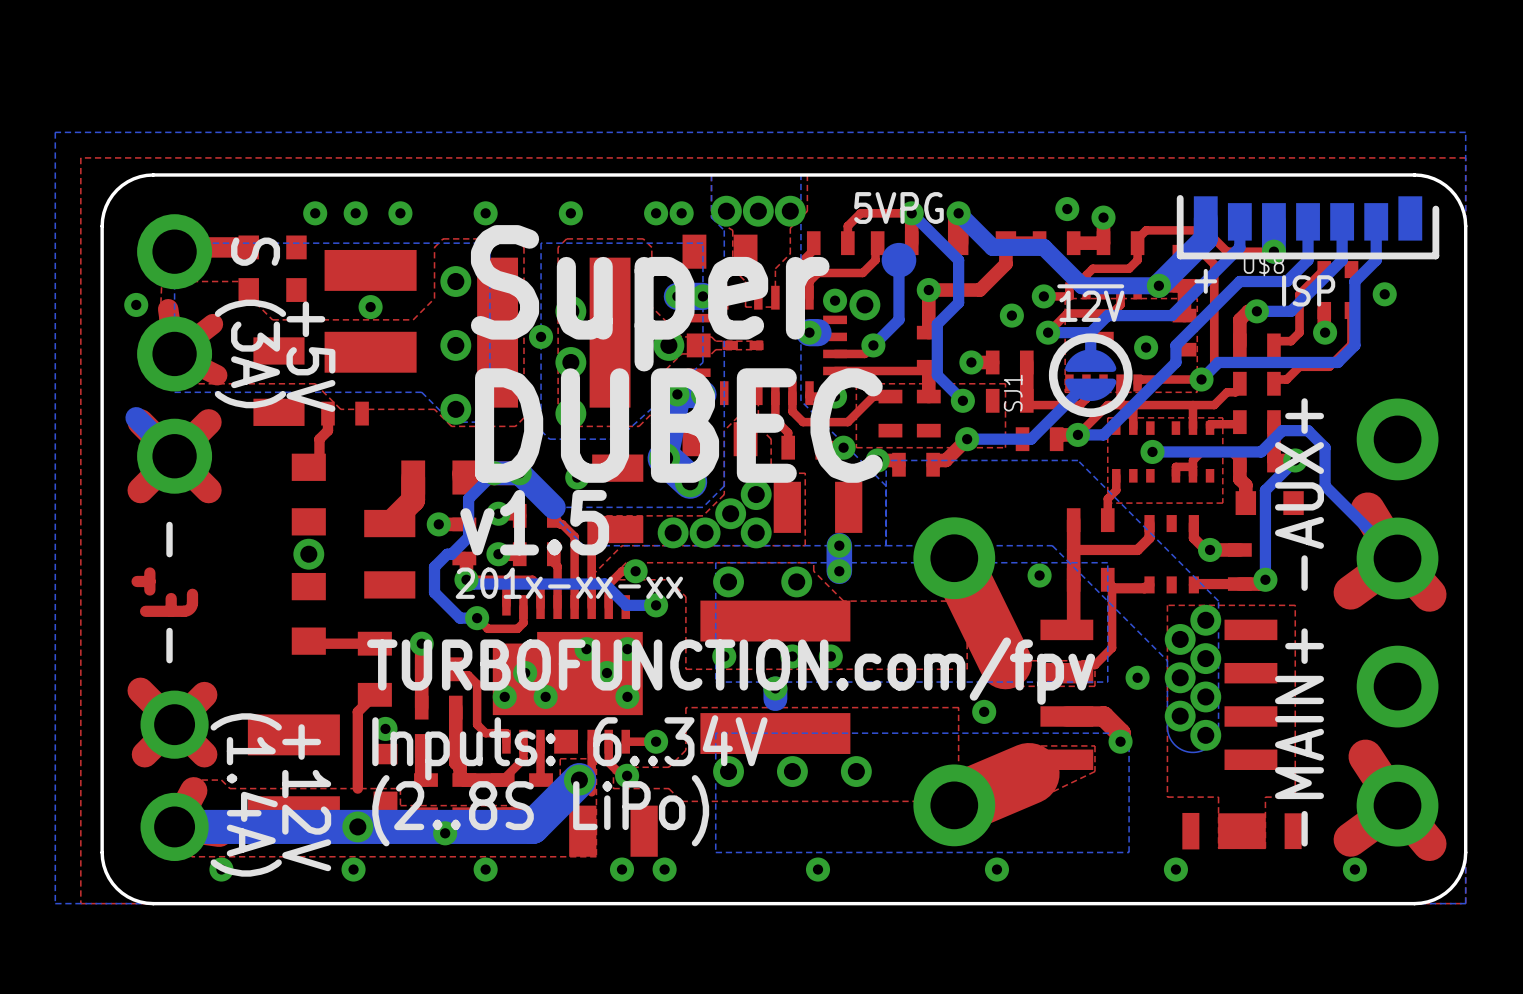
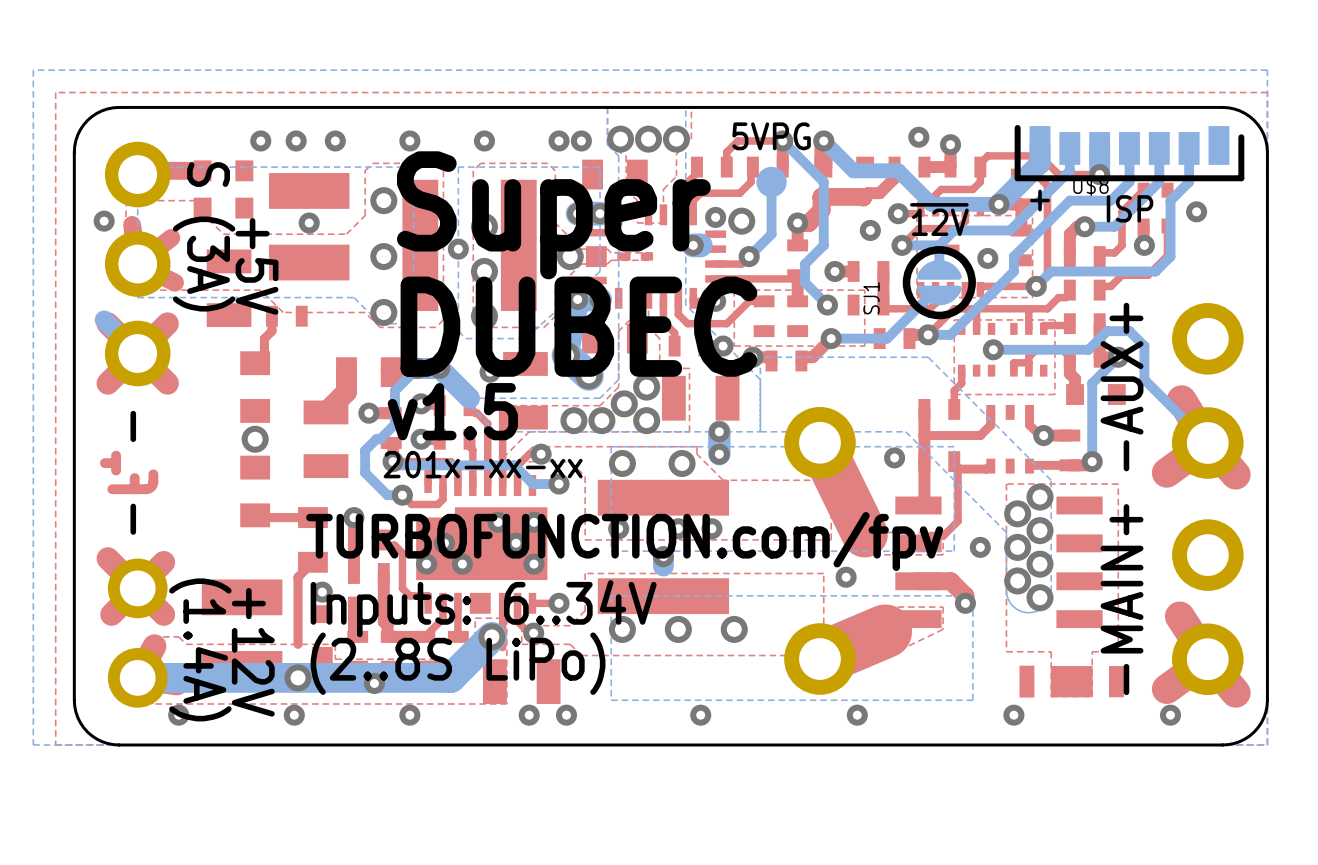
top track: (1039, 243) (1005, 243) (1005, 264) (979, 290) (928, 290) (928, 307) -> (894, 167) (894, 178) (879, 193) (867, 193) (863, 197) (821, 196) (821, 210) (808, 223) (797, 223)
via position: (928, 290) -> (797, 223)
bottom track: (958, 302) (937, 324) (937, 353) -> (823, 219) (823, 245) (805, 264)

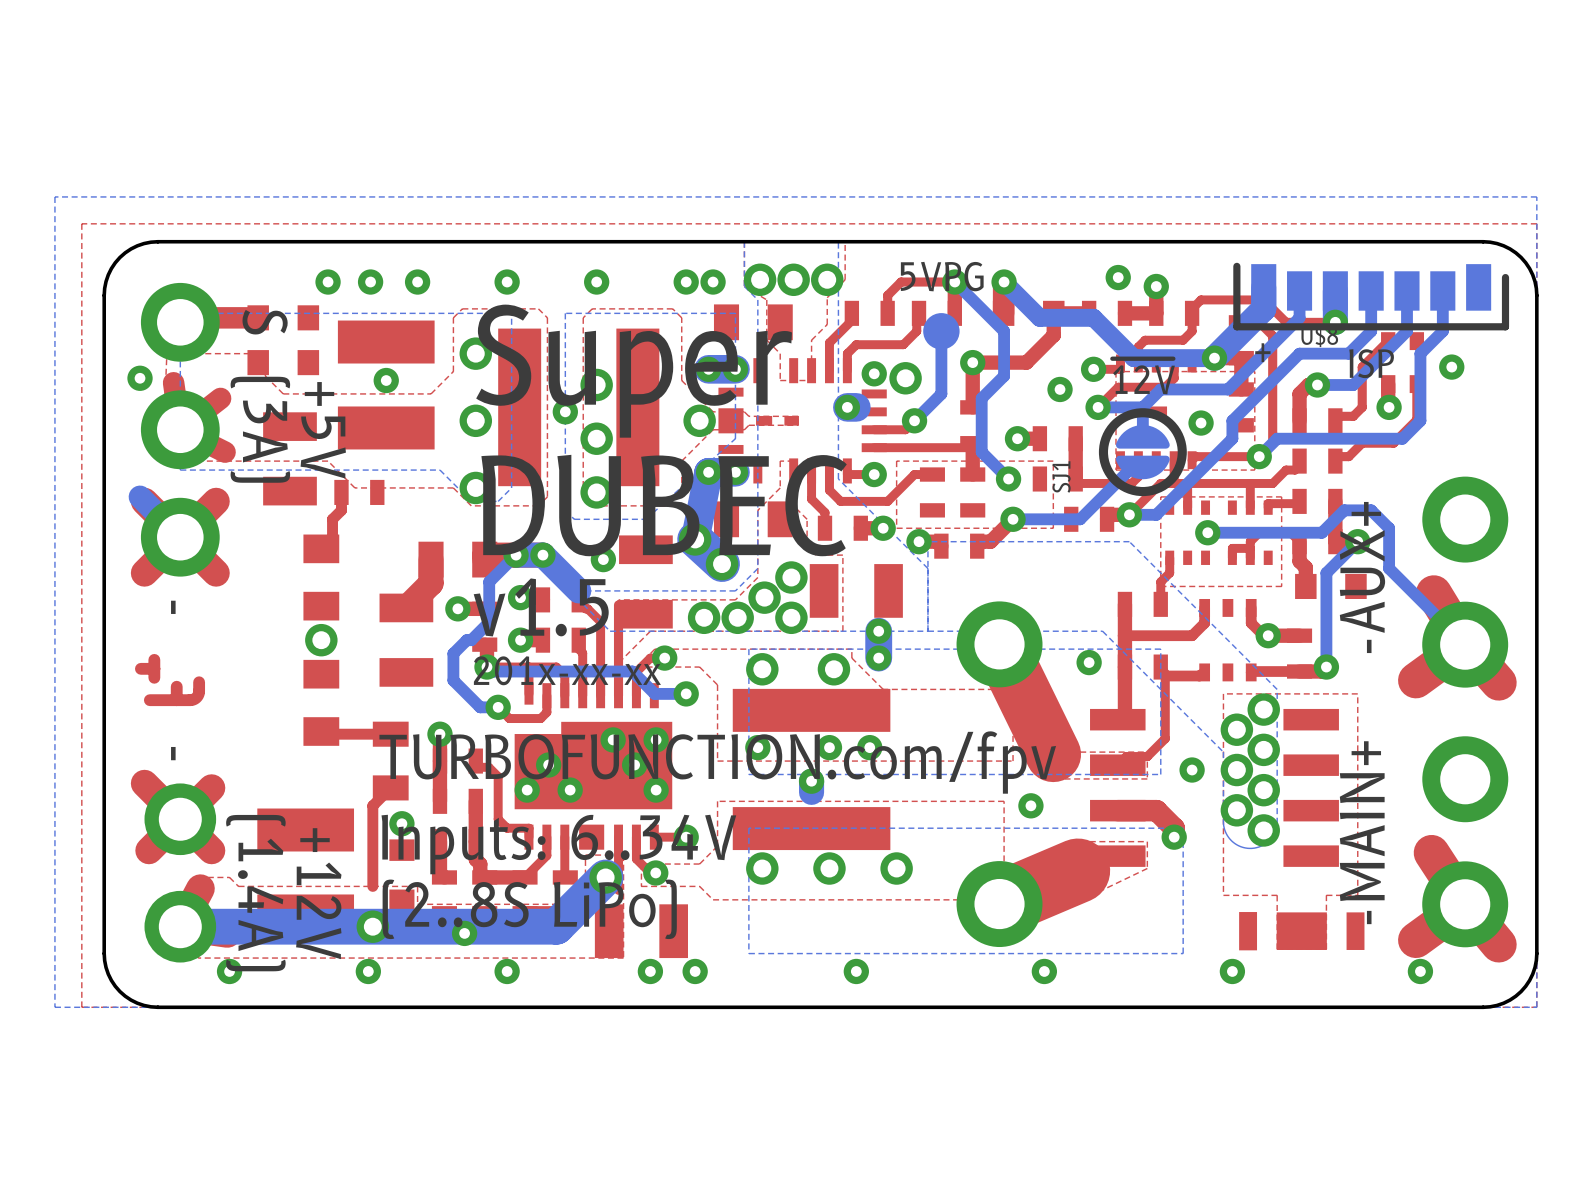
top track: (894, 167) (894, 178) (879, 193) (867, 193) (863, 197) (821, 196) (821, 210) (808, 223) (797, 223) -> (1089, 313) (1053, 313) (1053, 335) (1026, 362) (972, 362) (972, 380)
bottom track: (823, 219) (823, 245) (805, 264) -> (1004, 376) (981, 398) (981, 429)
via position: (797, 223) -> (972, 362)

